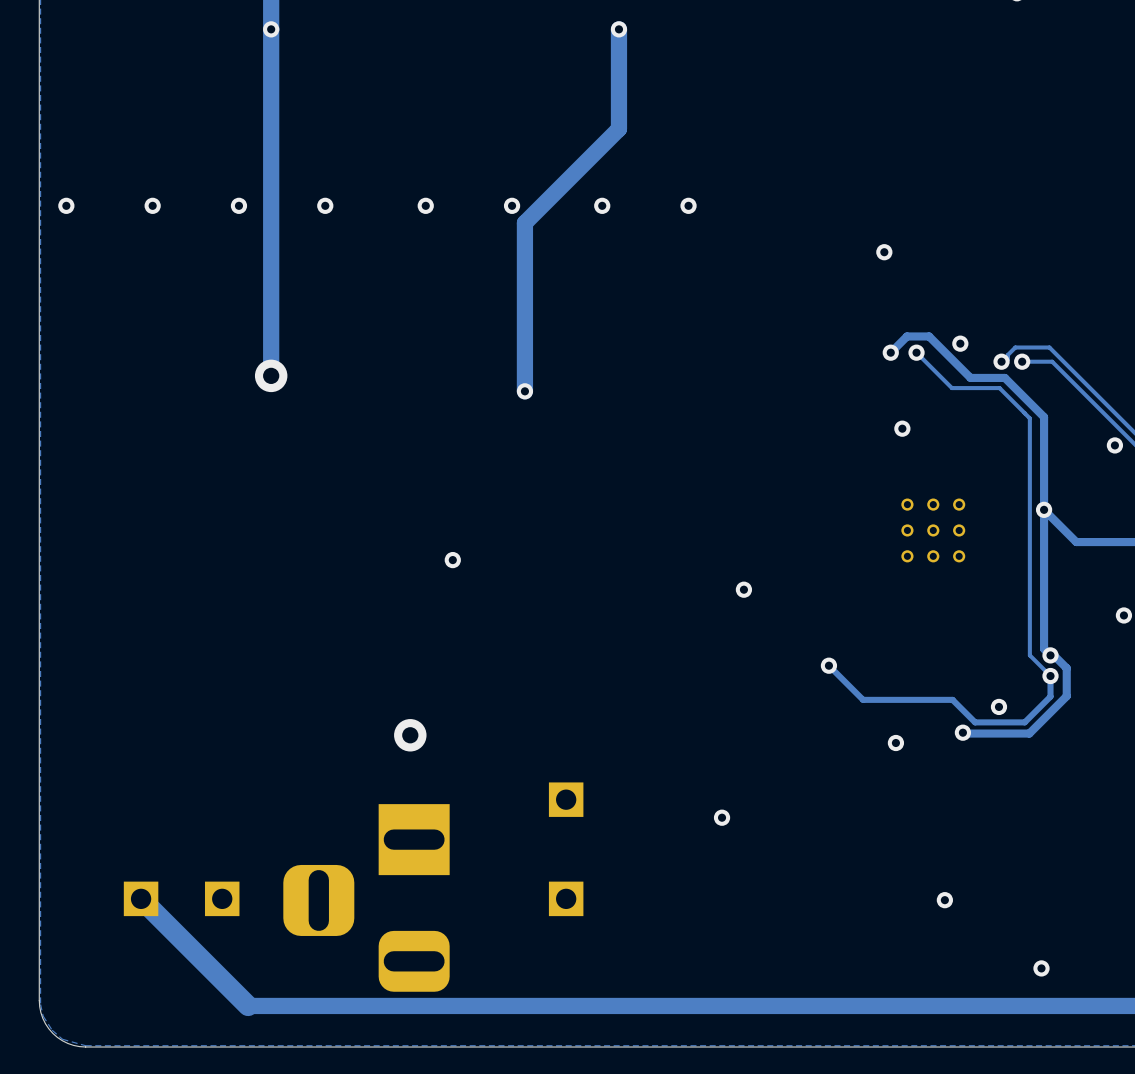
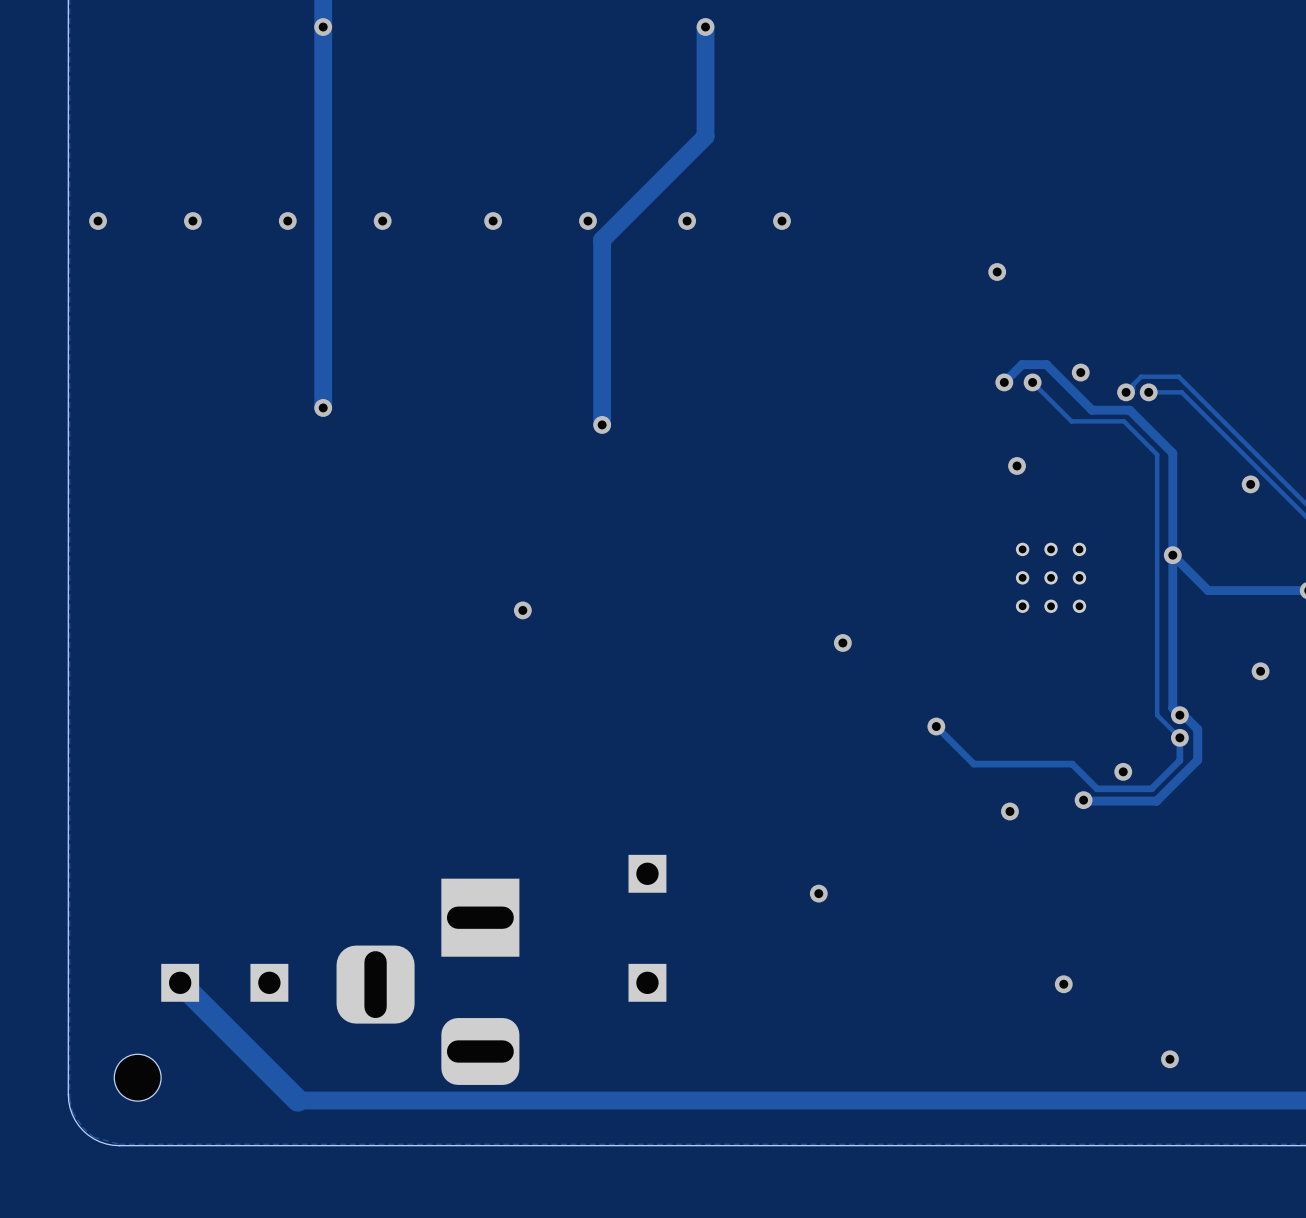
via size: [254, 359, 288, 393] -> [314, 399, 333, 417]
via: (410, 735) -> none
part: none -> (137, 1077)

